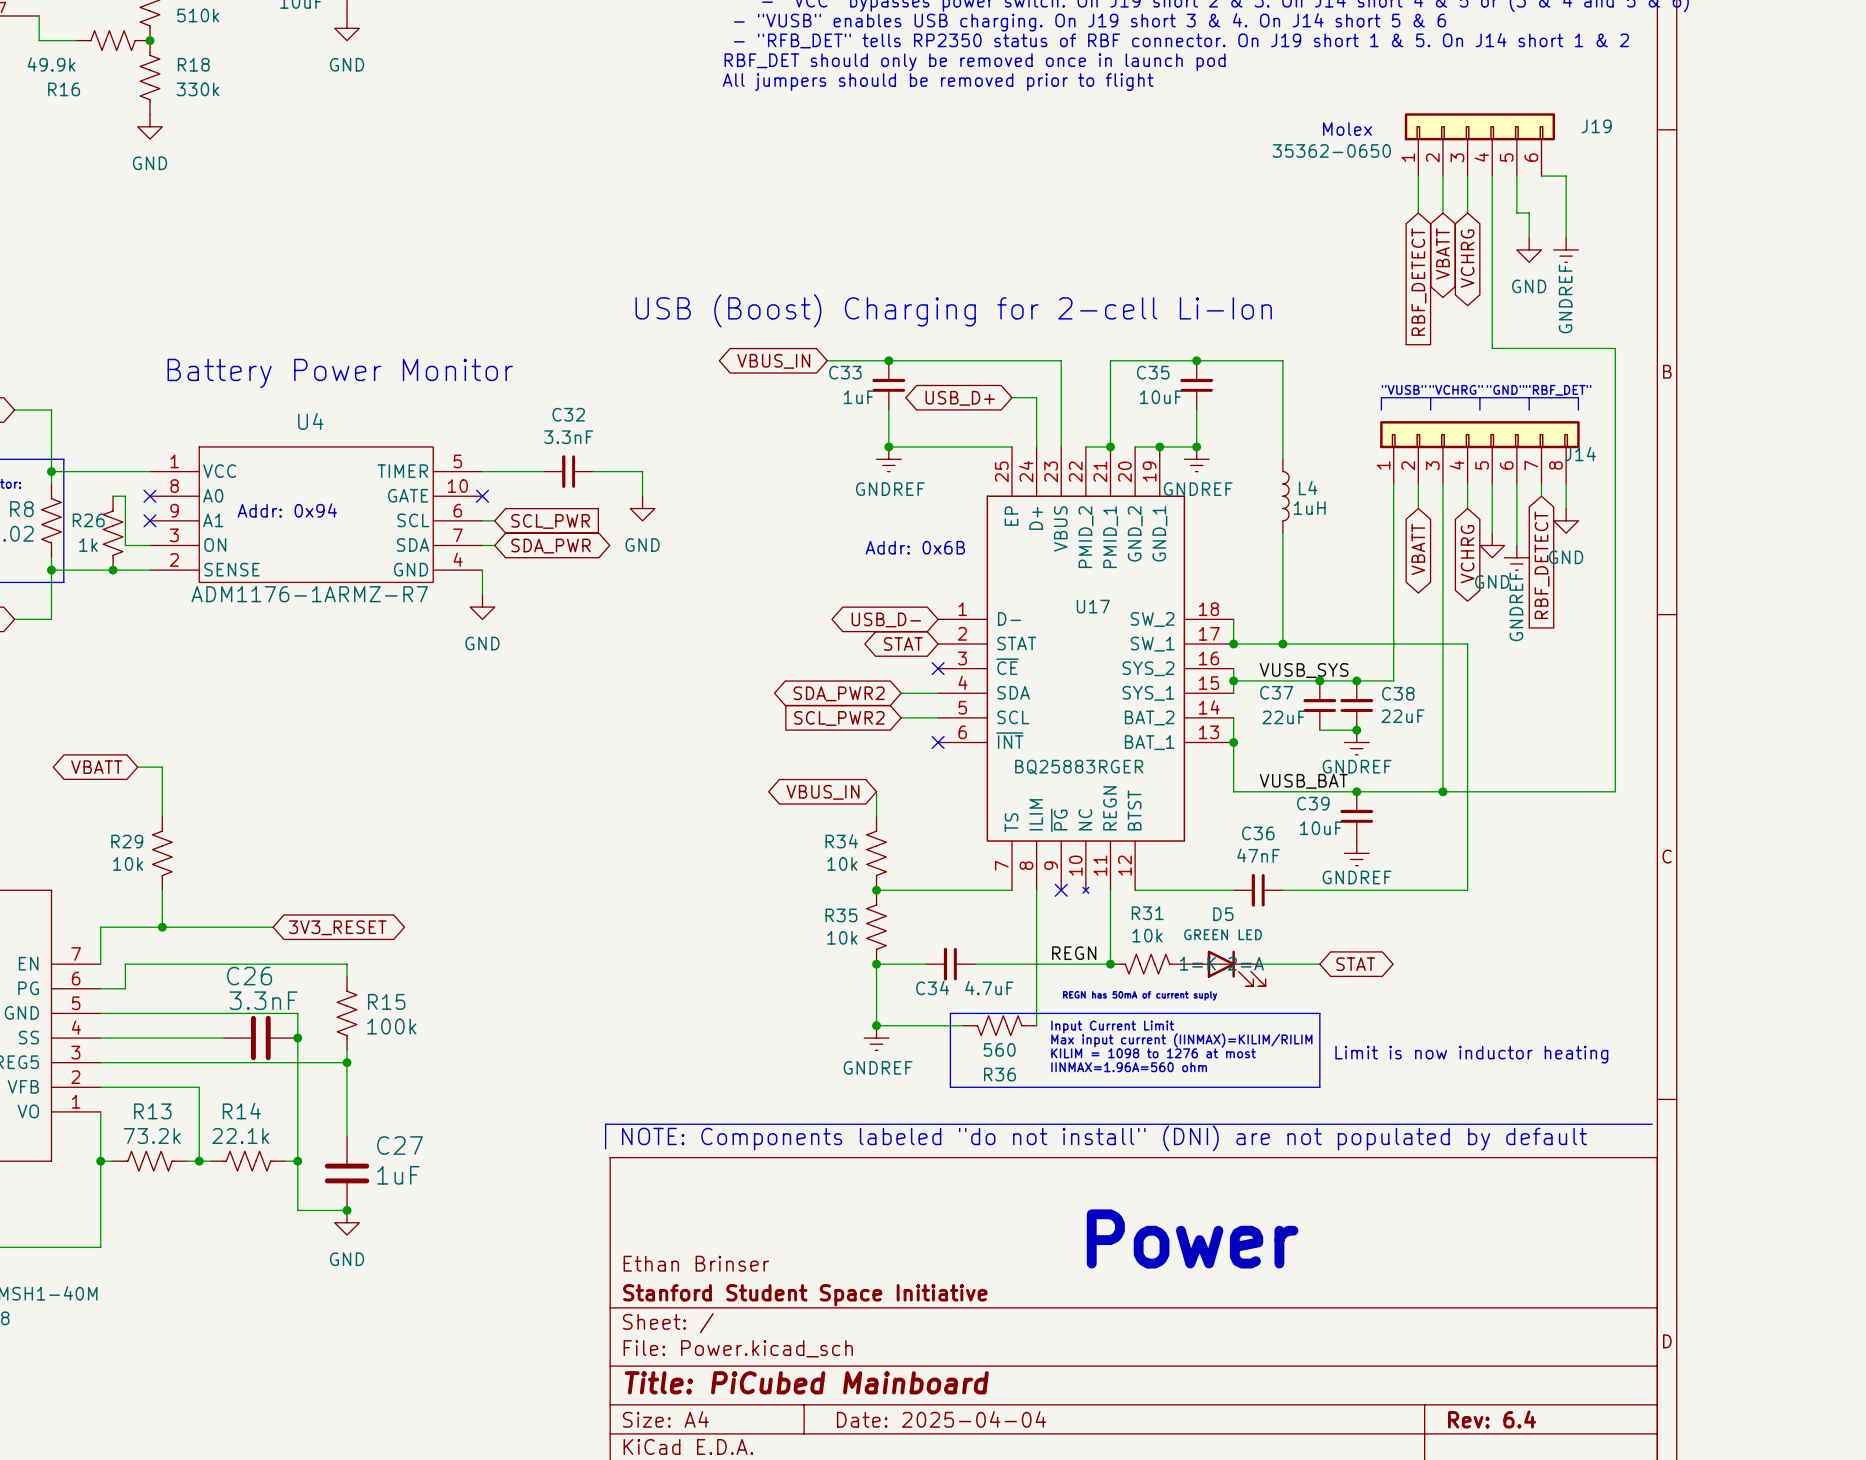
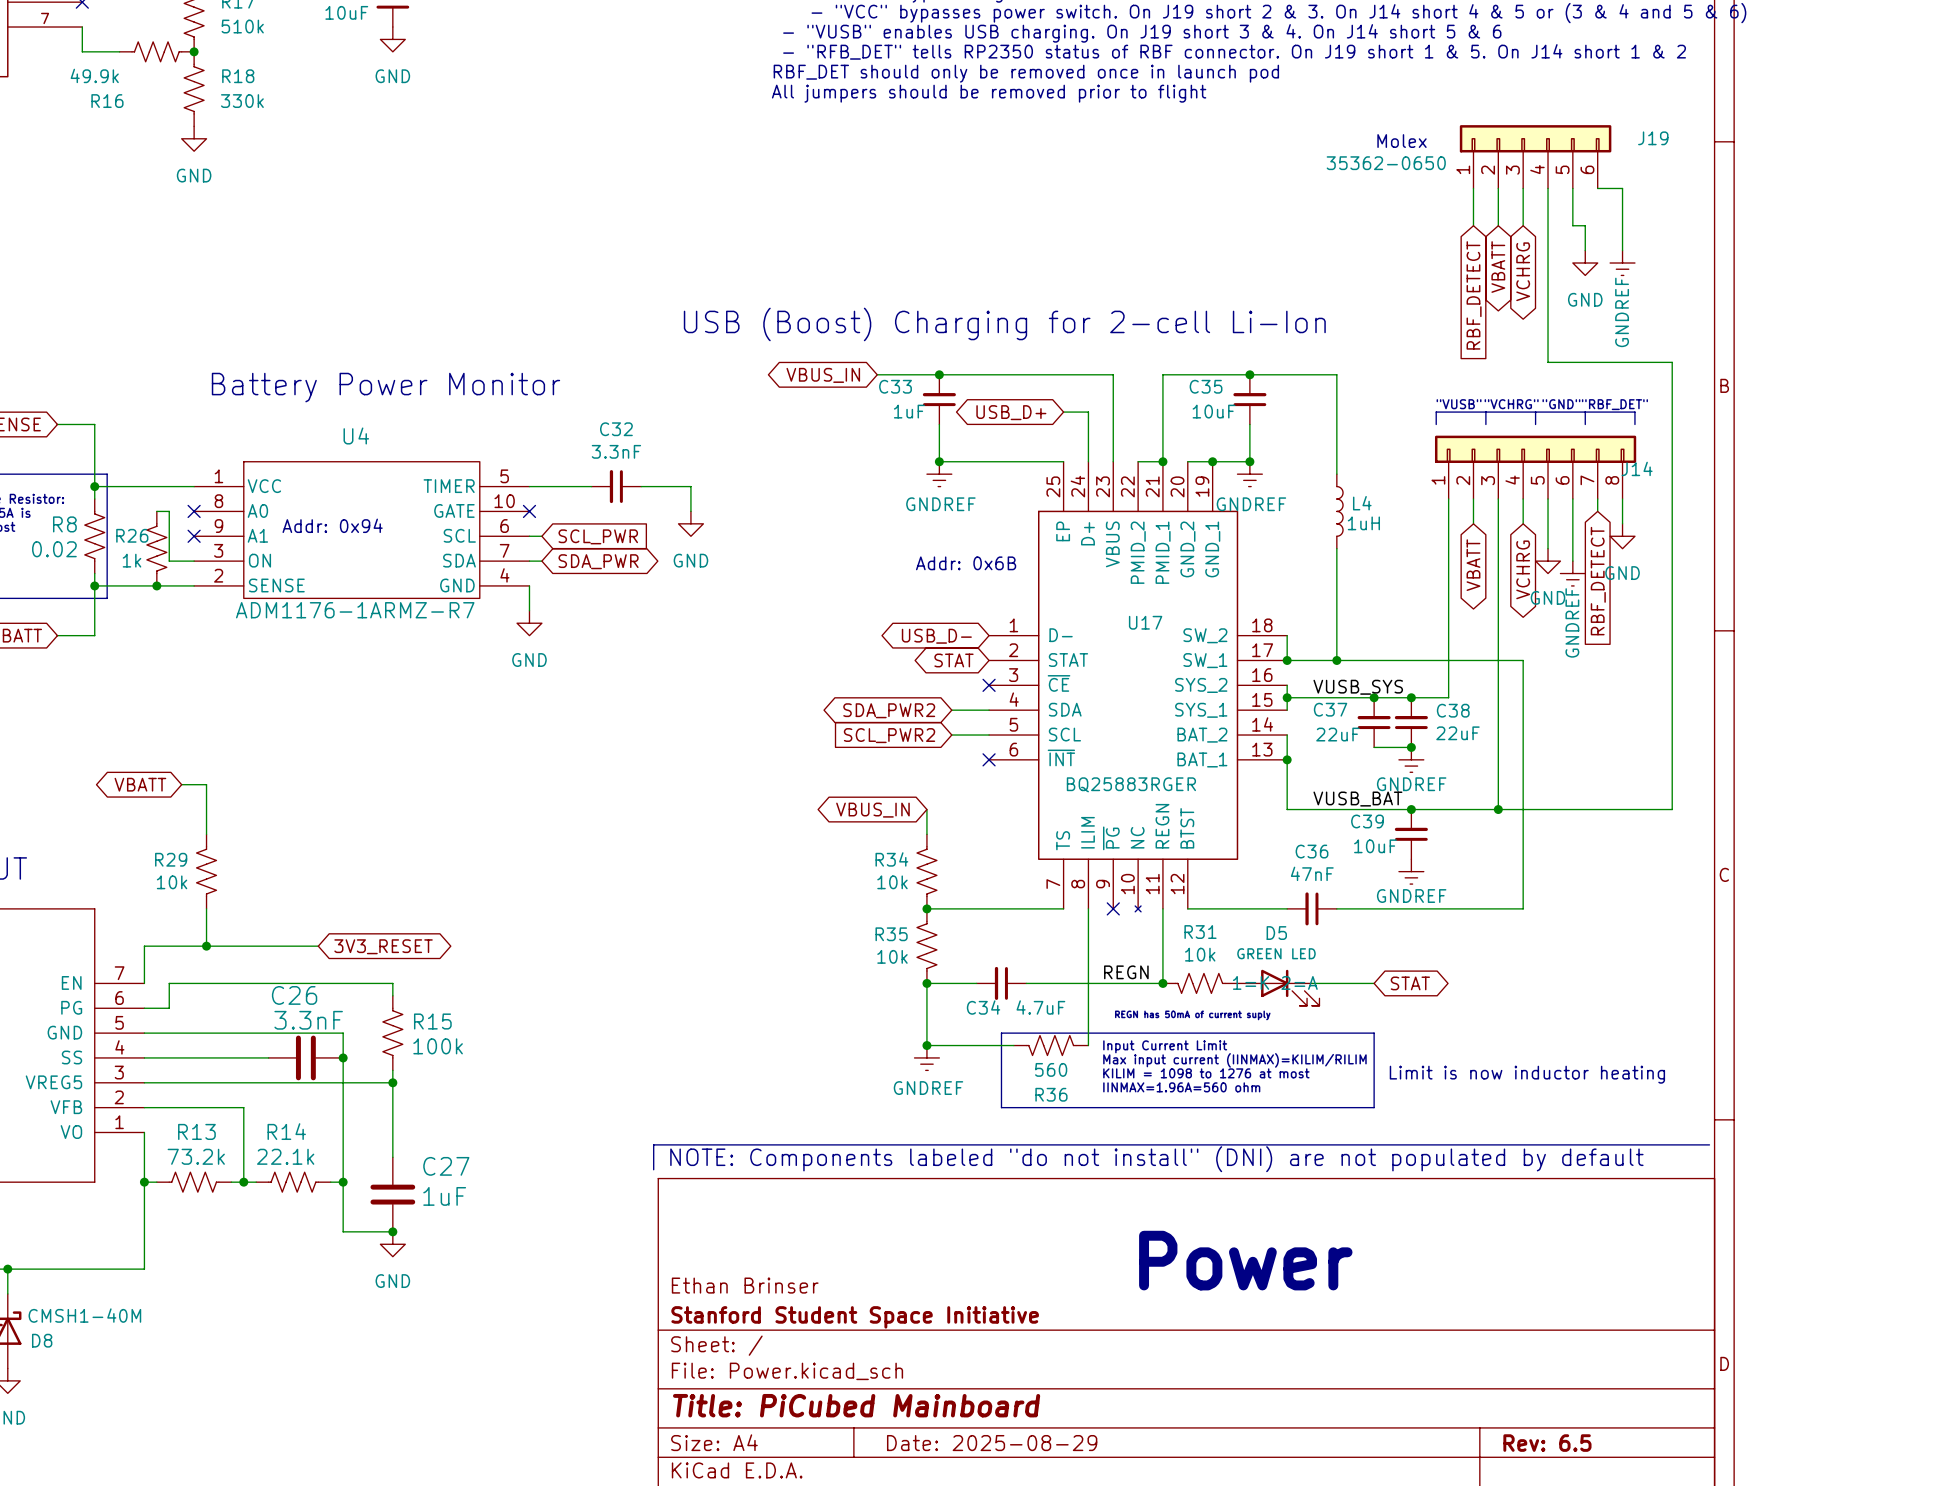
title block: Date: 2025-04-04 (941, 1419) -> Date: 2025-08-29 (992, 1443)
title block: Rev: 6.4 (1492, 1419) -> Rev: 6.5 (1547, 1443)

